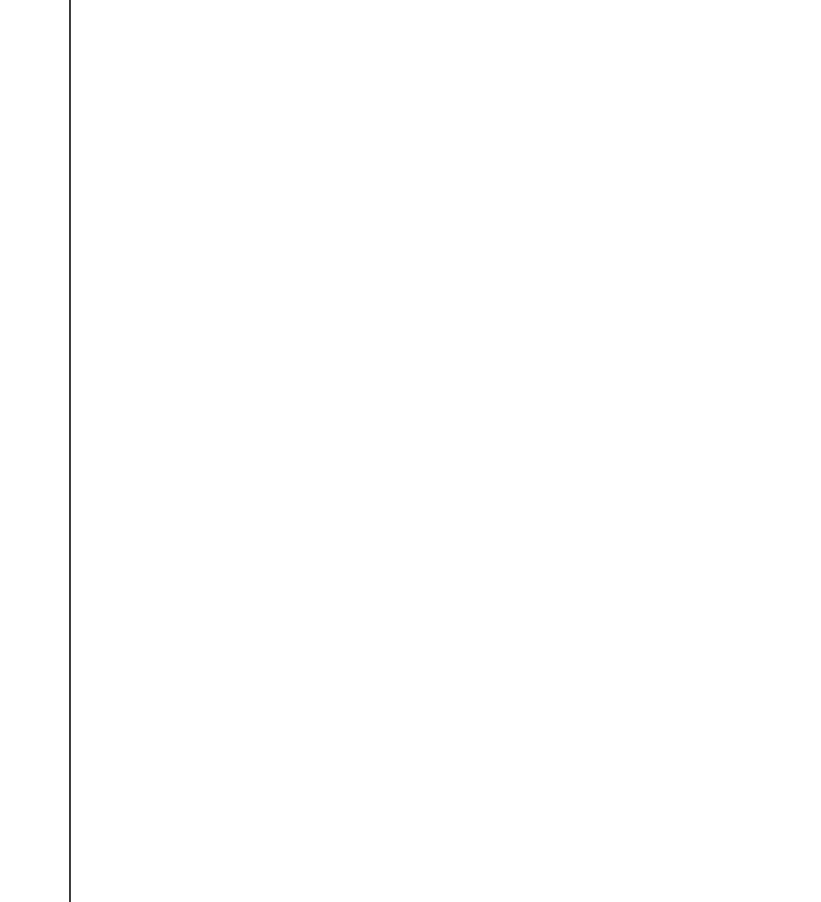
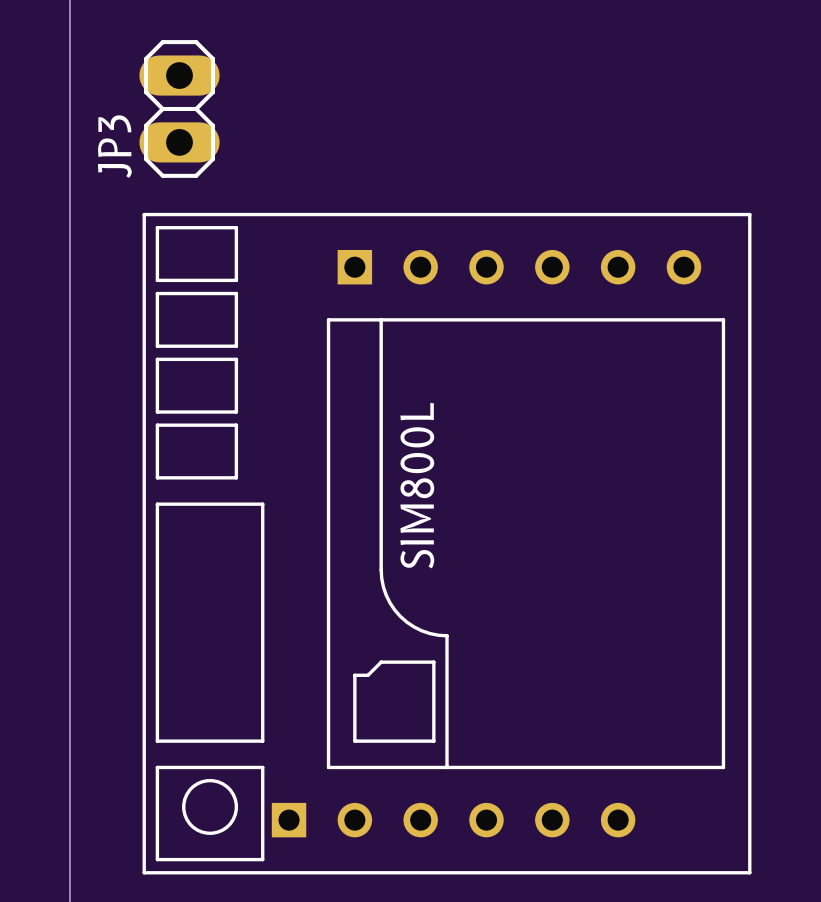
JP3: none -> (179, 108)
part: none -> (447, 543)

